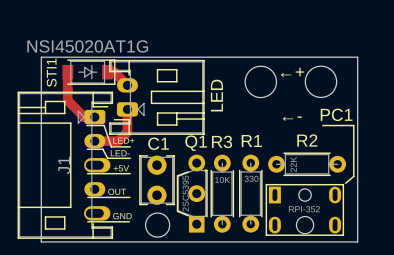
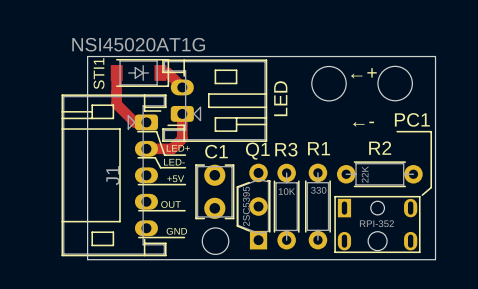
J1 footprint: [17, 91, 114, 239] -> [61, 94, 167, 257]

